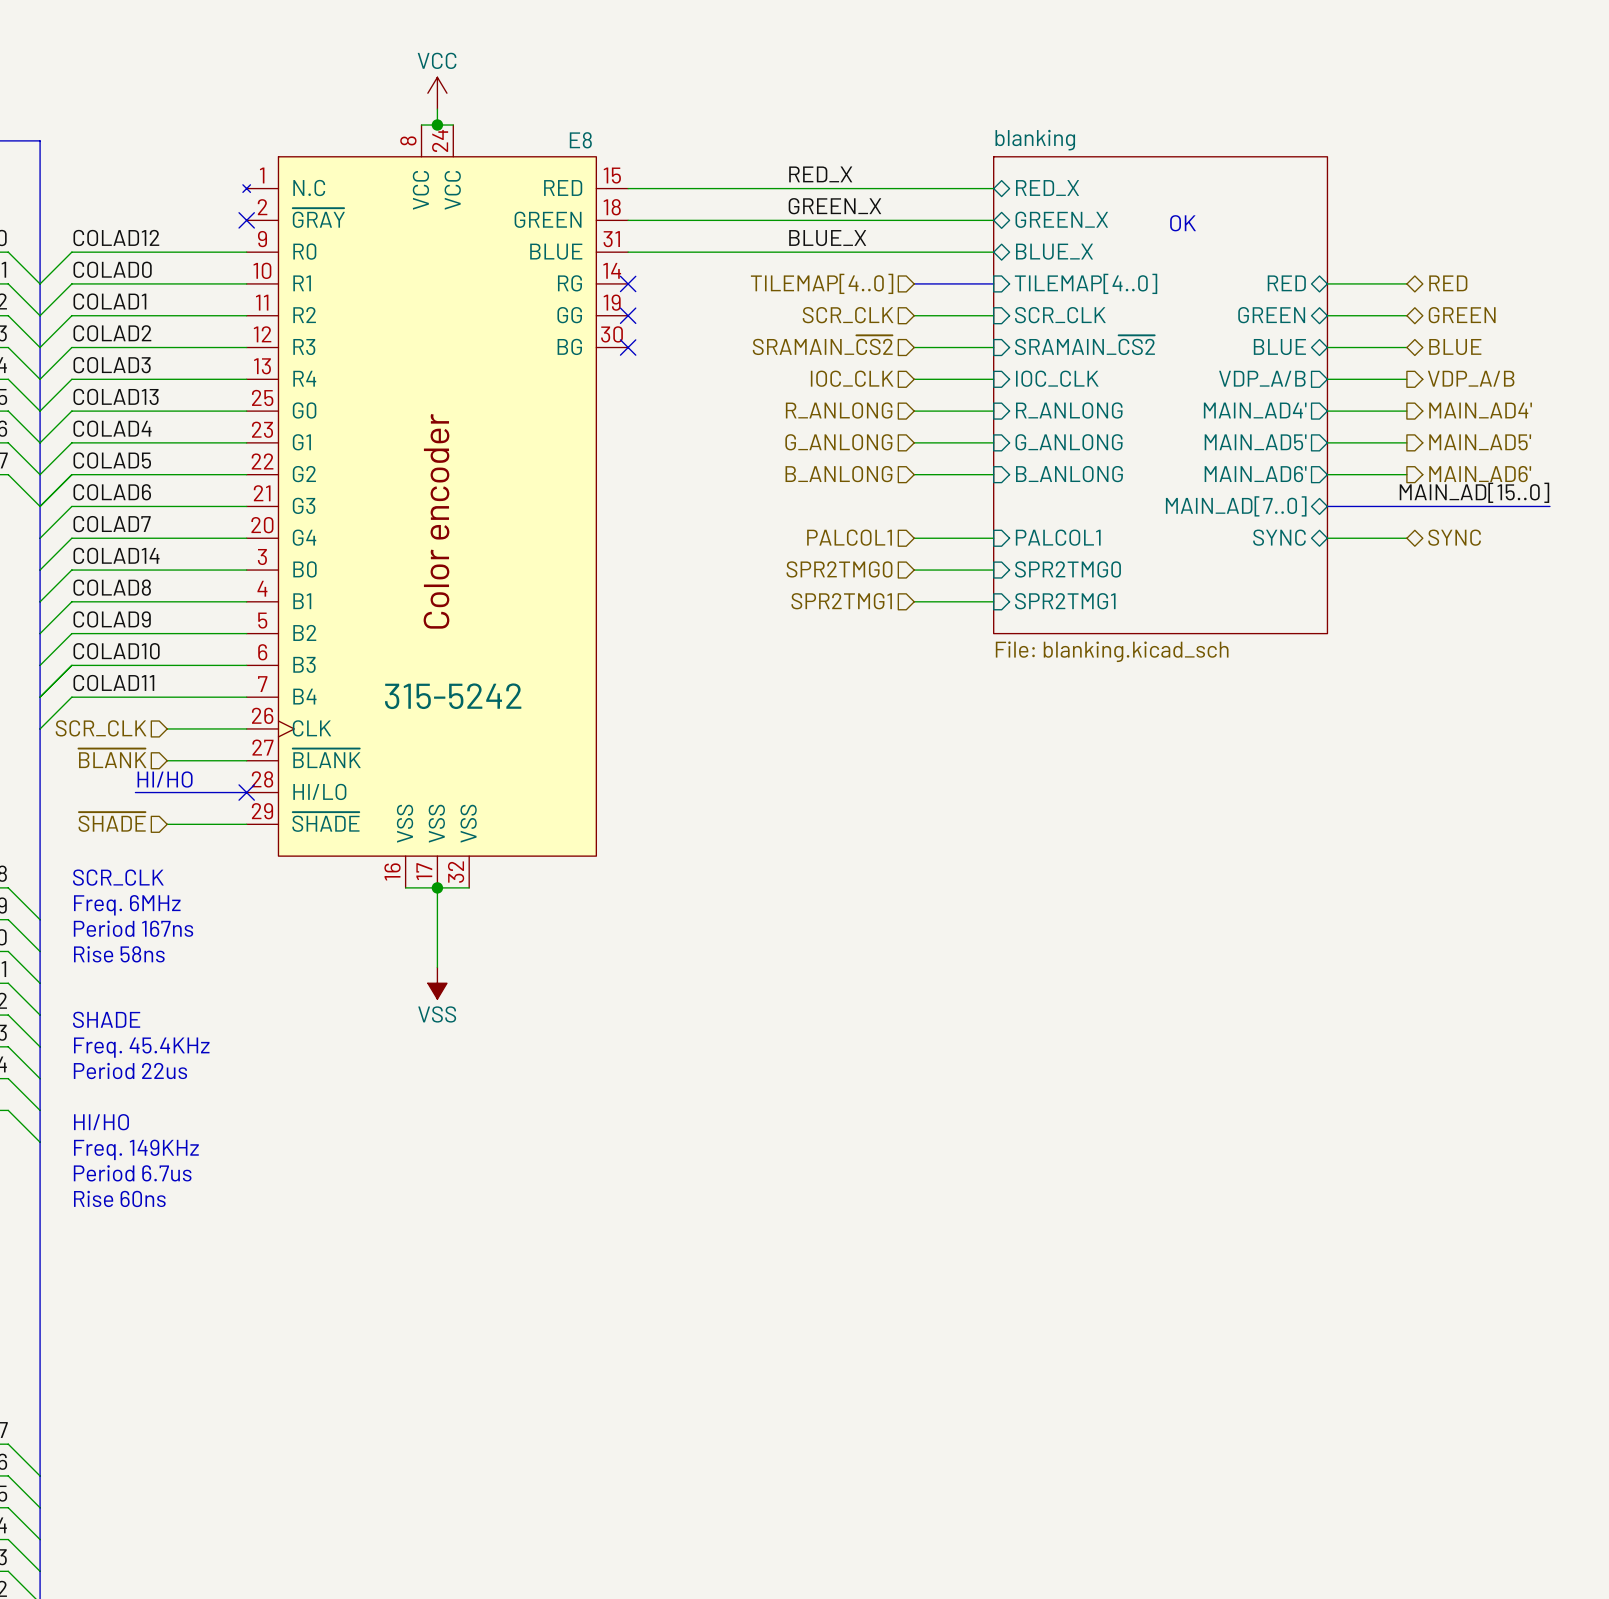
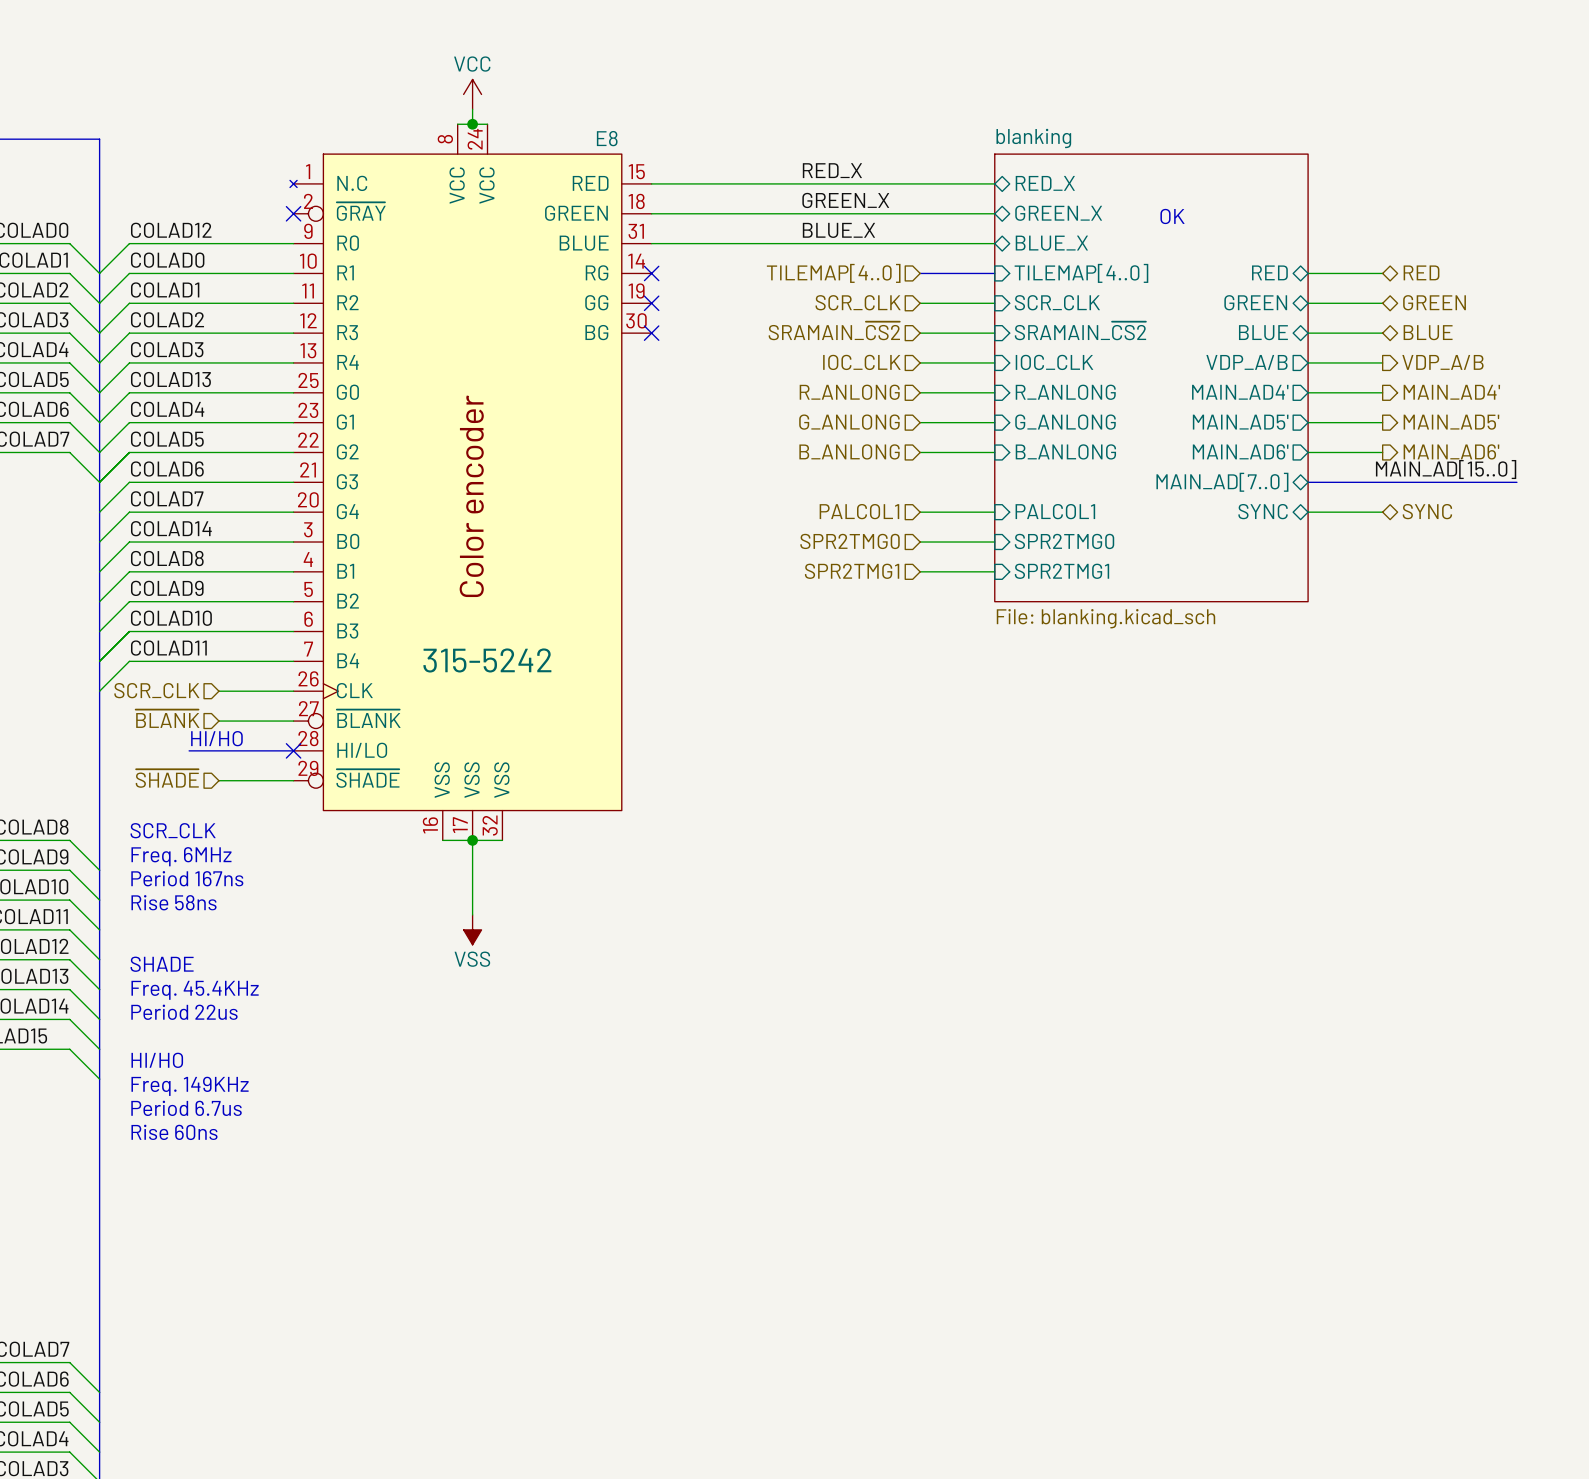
E8 symbol: [242, 125, 629, 888] -> [290, 124, 652, 841]

